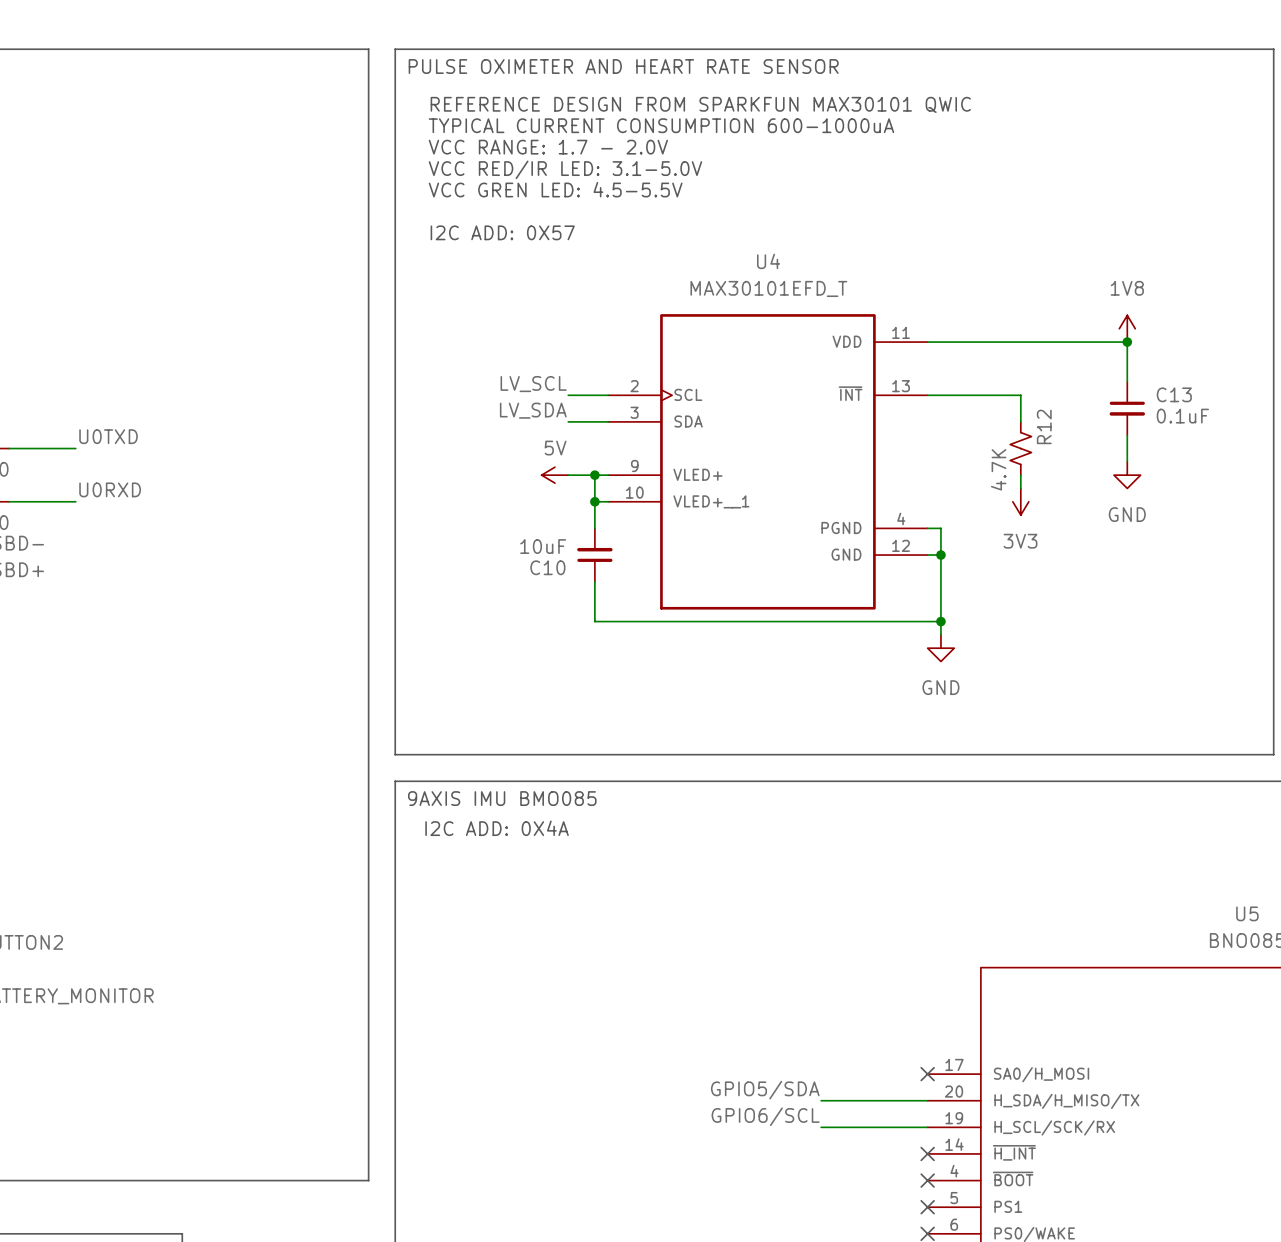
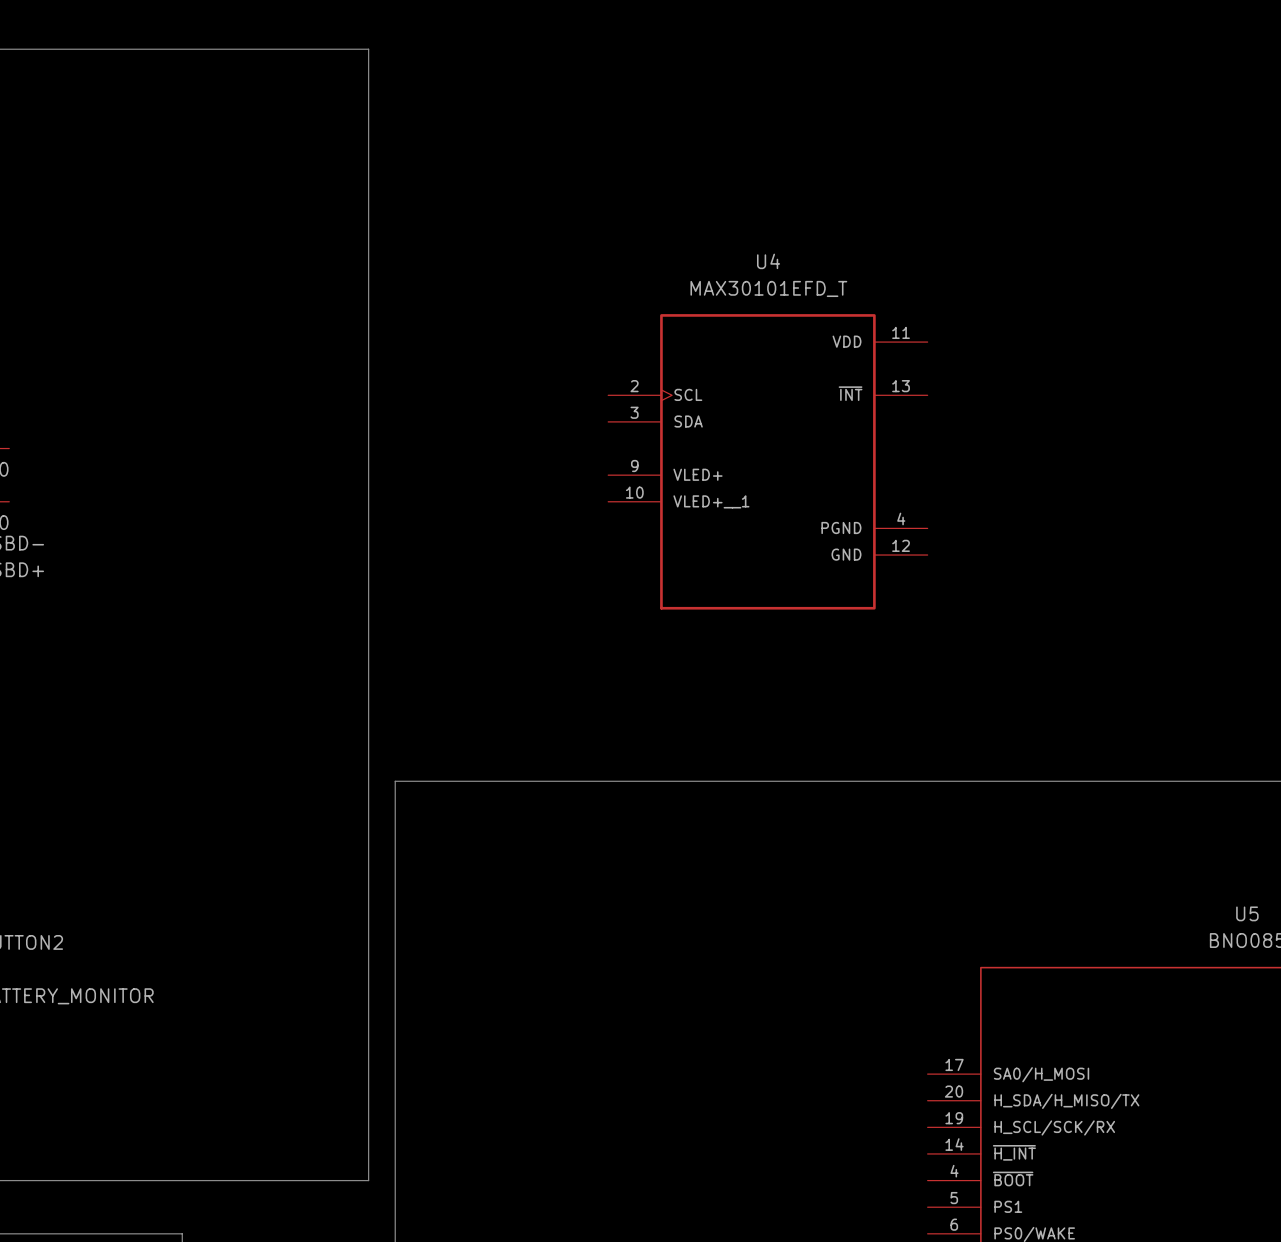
line: (395, 49) (1273, 49) (1273, 754) (395, 754) (395, 49) -> none
text: PULSE OXIMETER AND HEART RATE SENSOR (623, 66) -> none
text: REFERENCE DESIGN FROM SPARKFUN MAX30101 QWIC (700, 104) -> none
text: TYPICAL CURRENT CONSUMPTION 600-1000uA (661, 125) -> none
text: VCC RANGE: 1.7 - 2.0V (548, 147) -> none
text: VCC RED/IR LED: 3.1-5.0V (565, 169) -> none
text: VCC GREN LED: 4.5-5.5V (555, 189) -> none
text: I2C ADD: 0X57 (502, 232) -> none
power symbol: 1V8 (1127, 328) -> none
wire: (927, 342) (1127, 342) (1127, 381) -> none
junction: (1127, 342) -> none
label: LV_SCL (533, 384) -> none
wire: (568, 395) (608, 395) -> none
wire: (927, 395) (1020, 395) (1020, 421) -> none
C13: 0.1uF (1127, 408) -> none
label: LV_SDA (533, 410) -> none
wire: (568, 421) (608, 421) -> none
wire: (1127, 435) (1127, 461) -> none
label: U0TXD (108, 436) -> none
wire: (9, 448) (75, 448) -> none
R12: 4.7K (1020, 448) -> none
power symbol: 5V (554, 475) -> none
wire: (568, 475) (608, 475) -> none
wire: (594, 475) (594, 528) -> none
junction: (594, 475) -> none
wire: (1020, 475) (1020, 488) -> none
power symbol: GND (1127, 475) -> none
label: U0RXD (110, 489) -> none
wire: (9, 501) (75, 501) -> none
wire: (594, 501) (608, 501) -> none
junction: (594, 501) -> none
power symbol: 3V3 (1020, 501) -> none
wire: (927, 528) (940, 528) (940, 634) -> none
C10: 10uF (594, 555) -> none
wire: (927, 555) (940, 555) -> none
junction: (940, 555) -> none
wire: (594, 581) (594, 621) (940, 621) -> none
junction: (940, 621) -> none
power symbol: GND (940, 648) -> none
text: 9AXIS IMU BMO085 (502, 798) -> none
text: I2C ADD: 0X4A (497, 828) -> none
no-connect mark: (927, 1074) -> none
label: GPIO5/SDA (765, 1090) -> none
wire: (821, 1100) (927, 1100) -> none
label: GPIO6/SCL (765, 1116) -> none
wire: (821, 1127) (927, 1127) -> none
no-connect mark: (927, 1153) -> none
no-connect mark: (927, 1180) -> none
no-connect mark: (927, 1207) -> none
no-connect mark: (927, 1233) -> none

